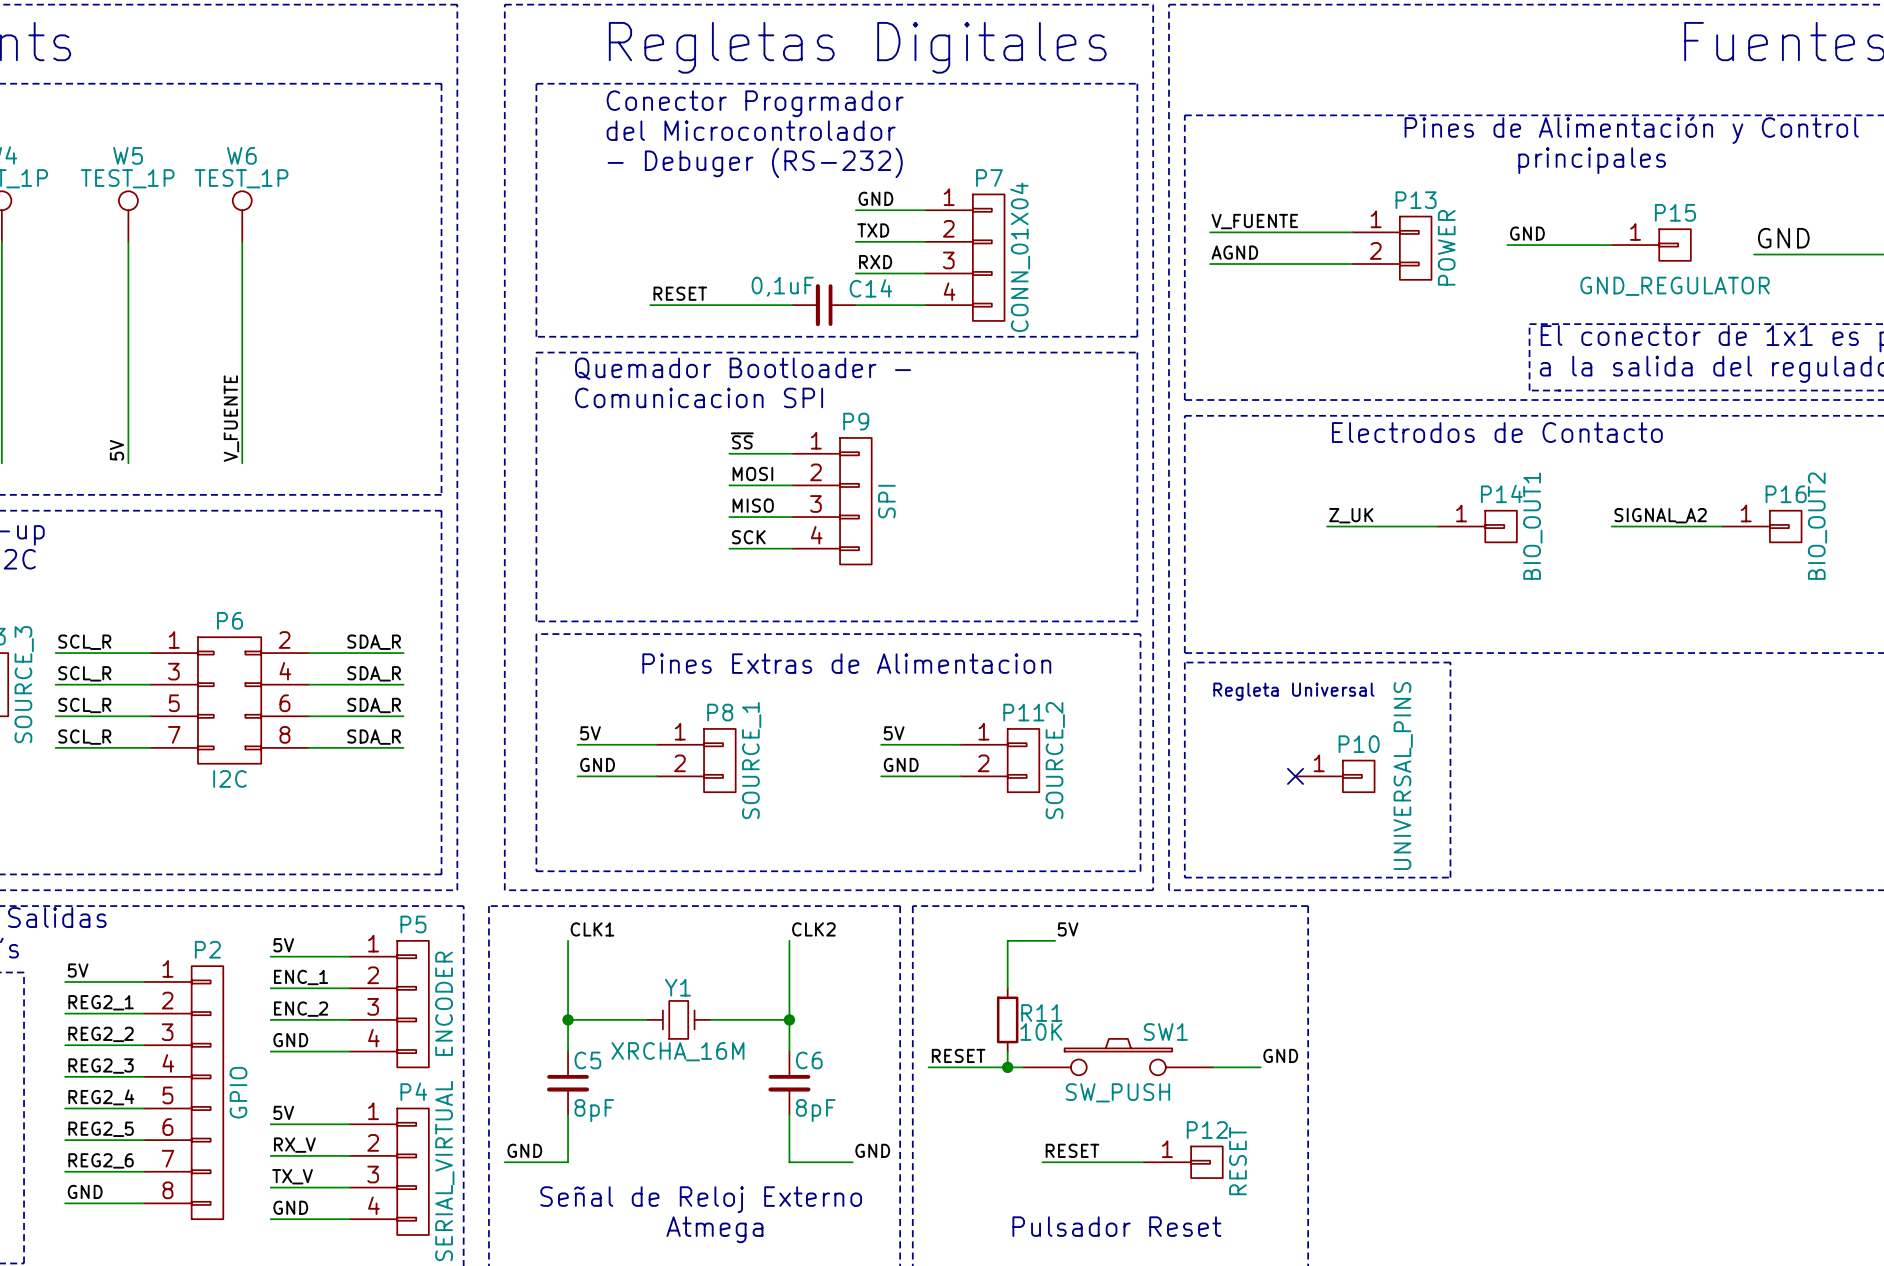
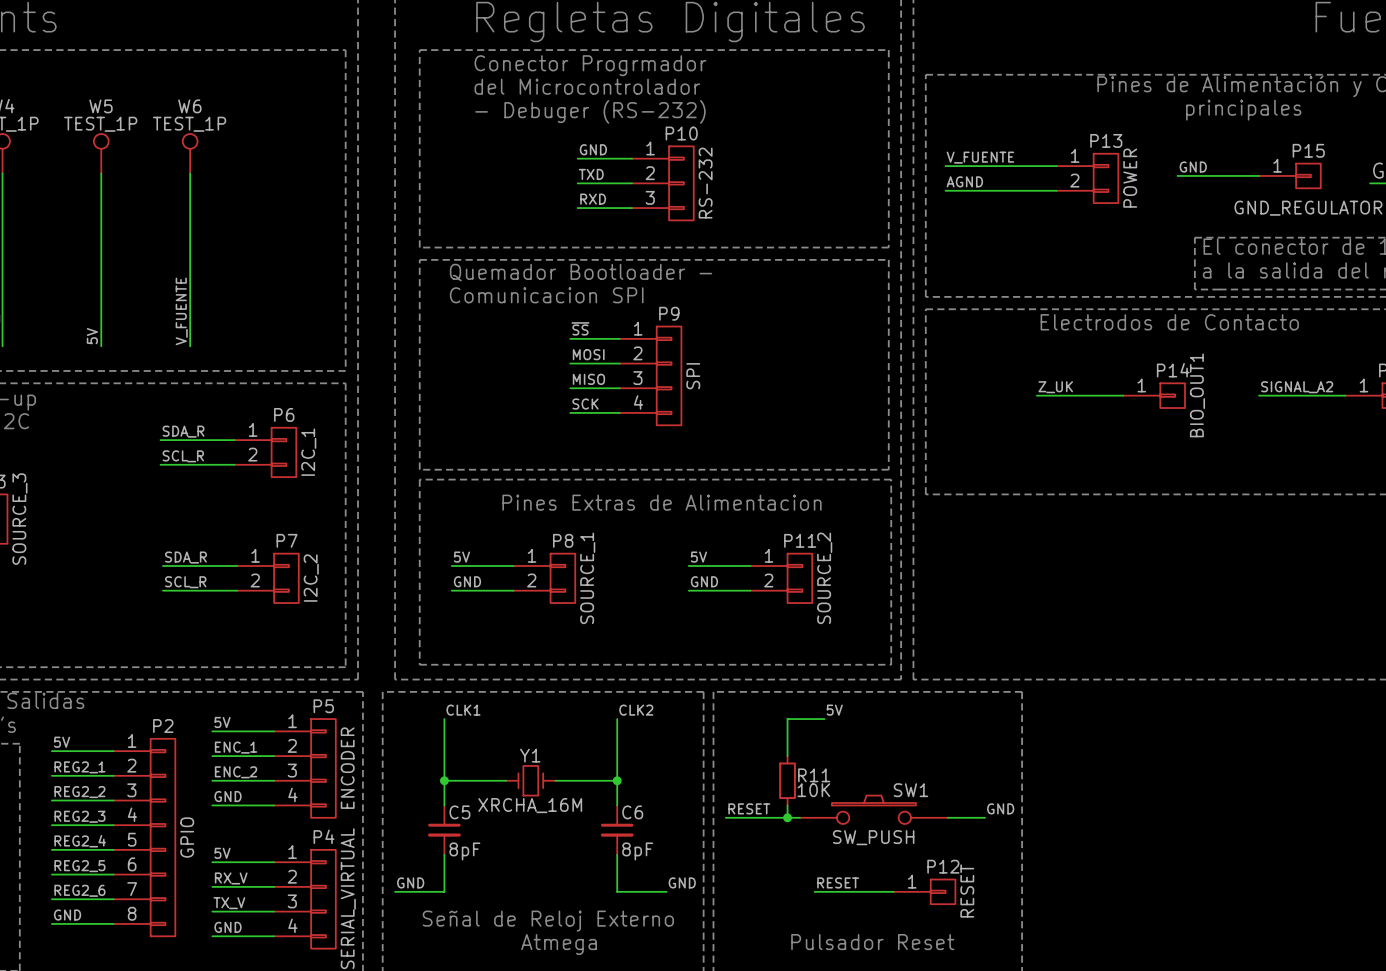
P7 name position: P7 (989, 178) -> P7 (287, 540)
P7 symbol: [925, 194, 1005, 321] -> [237, 553, 299, 604]
label position: GND (875, 198) -> GND (593, 149)
wire: (855, 210) (925, 210) -> (577, 158) (632, 158)
label position: TXD (873, 230) -> TXD (591, 174)
wire: (855, 241) (925, 241) -> (577, 183) (632, 183)
P7 value: CONN_01X04 (1020, 257) -> I2C_2 (311, 578)
label position: RXD (875, 262) -> RXD (593, 199)
wire: (855, 273) (925, 273) -> (577, 208) (632, 208)
label: RESET (680, 293) -> none
wire: (650, 305) (792, 305) -> none
C14: 0,1uF (824, 305) -> none
wire: (855, 305) (925, 305) -> none
label: none -> SDA_R (183, 431)
label: none -> SCL_R (183, 456)
P6 name position: P6 (229, 620) -> P6 (284, 414)
P6 symbol: [150, 637, 309, 764] -> [234, 427, 297, 478]
label: SCL_R (84, 642) -> none
label: SDA_R (374, 642) -> none
wire: (55, 653) (150, 653) -> none
wire: (308, 653) (403, 653) -> (160, 440) (234, 440)
line: (1184, 662) (1184, 877) (1450, 877) (1450, 662) (1184, 662) -> none
label: SCL_R (84, 673) -> none
label: SDA_R (374, 673) -> none
wire: (55, 684) (150, 684) -> none
wire: (308, 684) (403, 684) -> (160, 464) (234, 464)
text: Regleta Universal (1293, 691) -> none
label: SCL_R (84, 705) -> none
label: SDA_R (374, 705) -> none
wire: (55, 716) (150, 716) -> none
wire: (308, 716) (403, 716) -> (162, 566) (237, 566)
label: none -> SDA_R (185, 557)
label: SCL_R (84, 737) -> none
label: SDA_R (374, 737) -> none
P10 name position: P10 (1359, 744) -> P10 (681, 133)
wire: (55, 747) (150, 747) -> none
wire: (308, 747) (403, 747) -> (162, 590) (237, 590)
P10 symbol: [1295, 760, 1375, 793] -> [632, 146, 694, 221]
label: none -> SCL_R (185, 582)
no-connect mark: (1295, 776) -> none
P10 value: UNIVERSAL_PINS (1403, 776) -> RS-232 (705, 183)
P6 value: I2C (229, 778) -> I2C_1 (308, 452)

